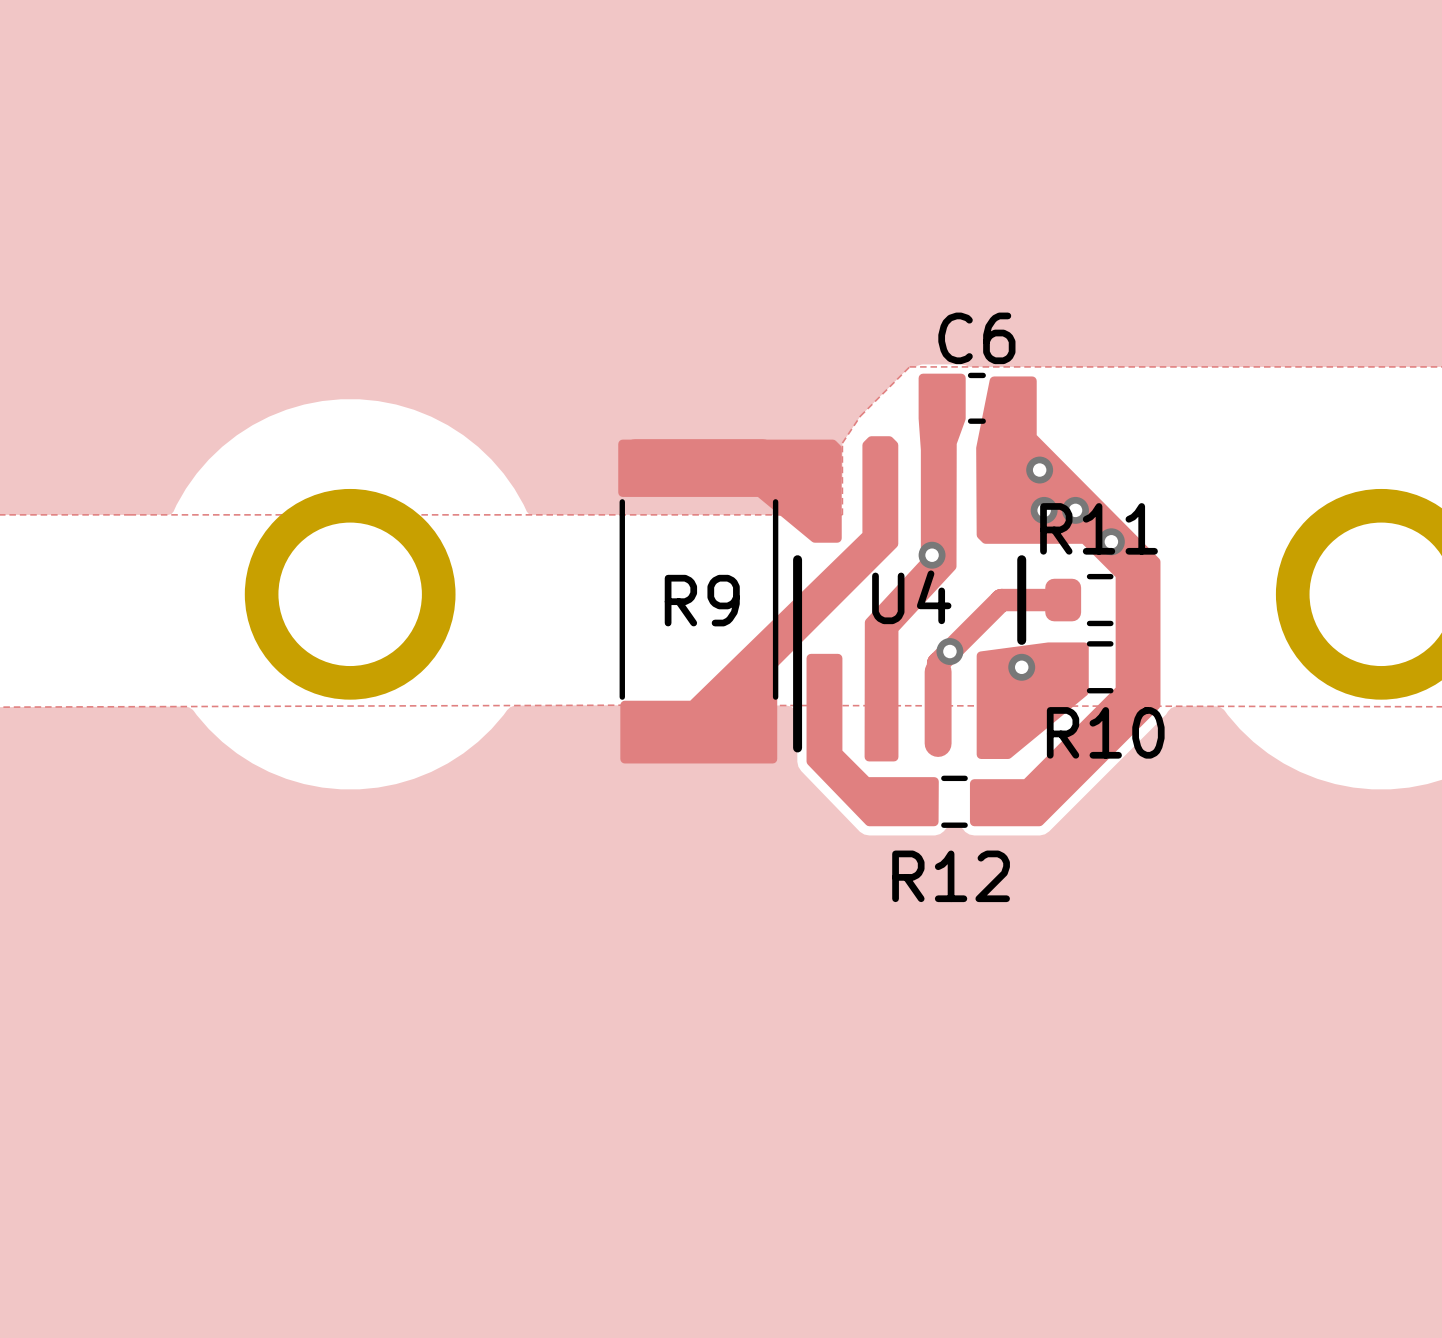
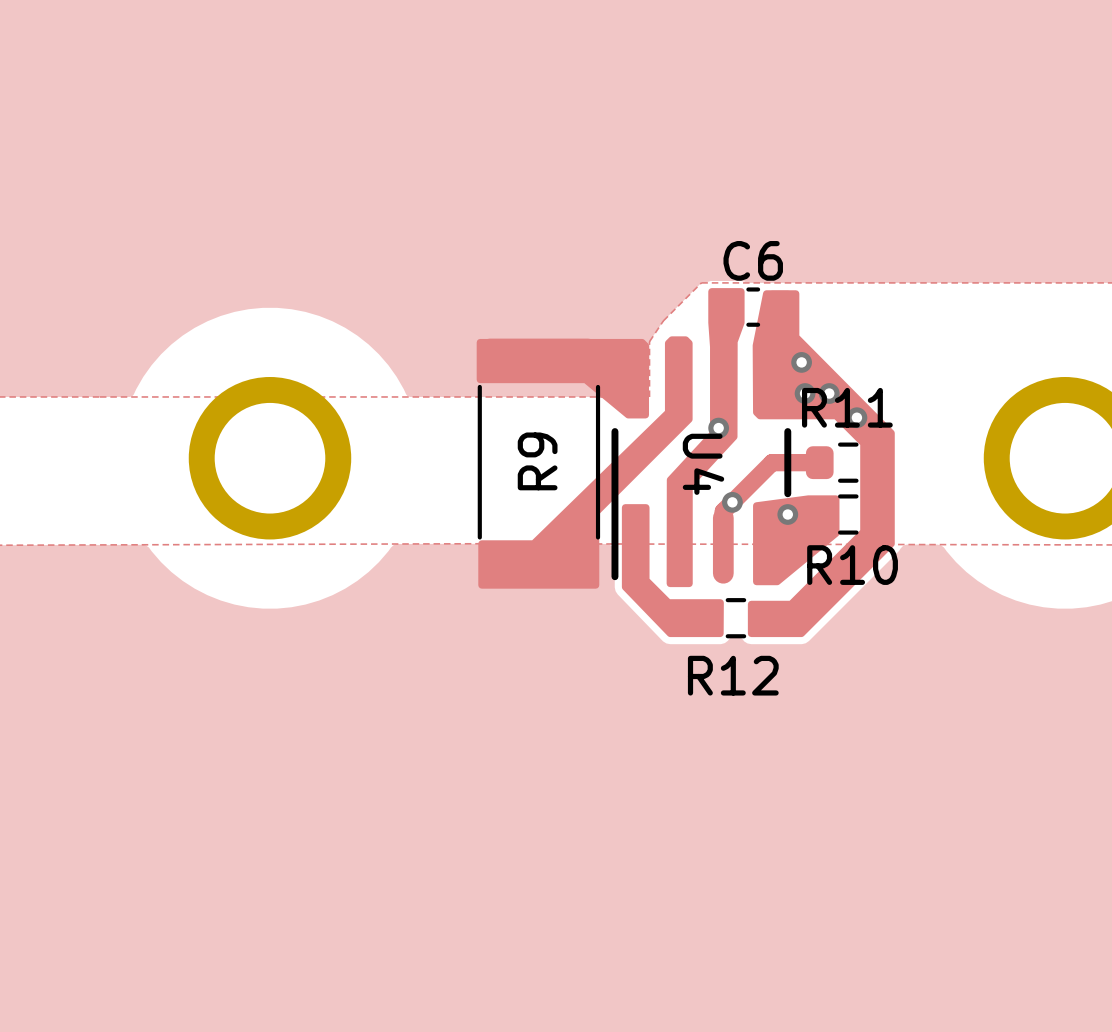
U4 name rotation: 0° (911, 597) -> 90° clockwise (703, 464)
R9 name rotation: 0° (702, 600) -> 90° counterclockwise (537, 461)

